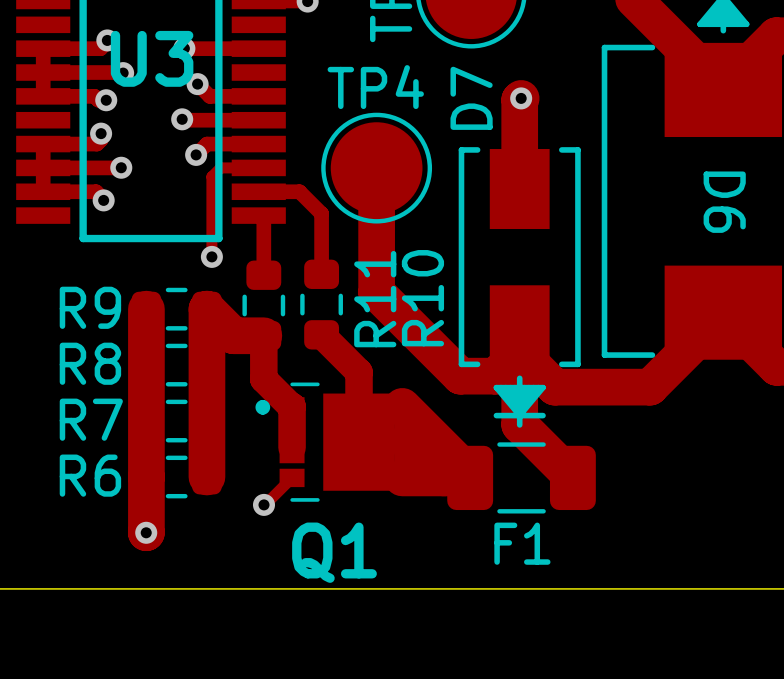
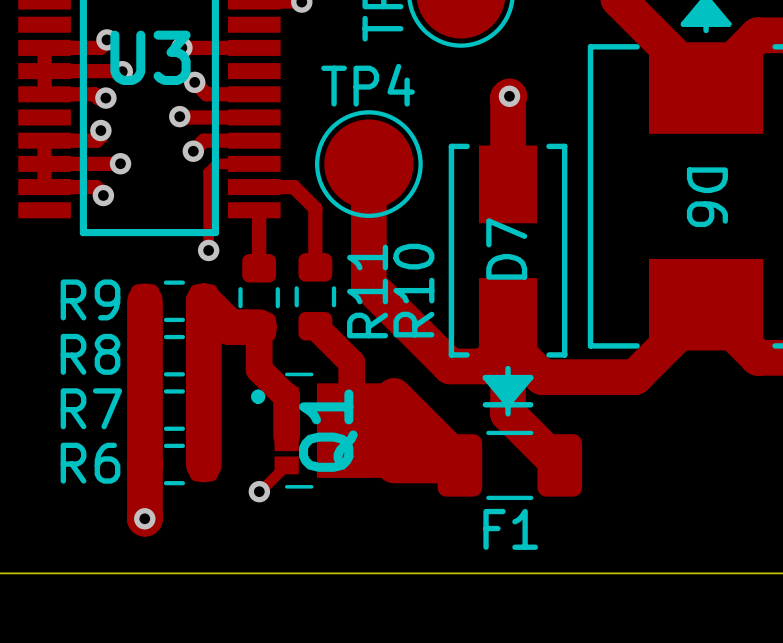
D7 name position: D7 (471, 98) -> D7 (506, 248)
Q1 name rotation: 0° (334, 552) -> 90° counterclockwise (328, 430)

